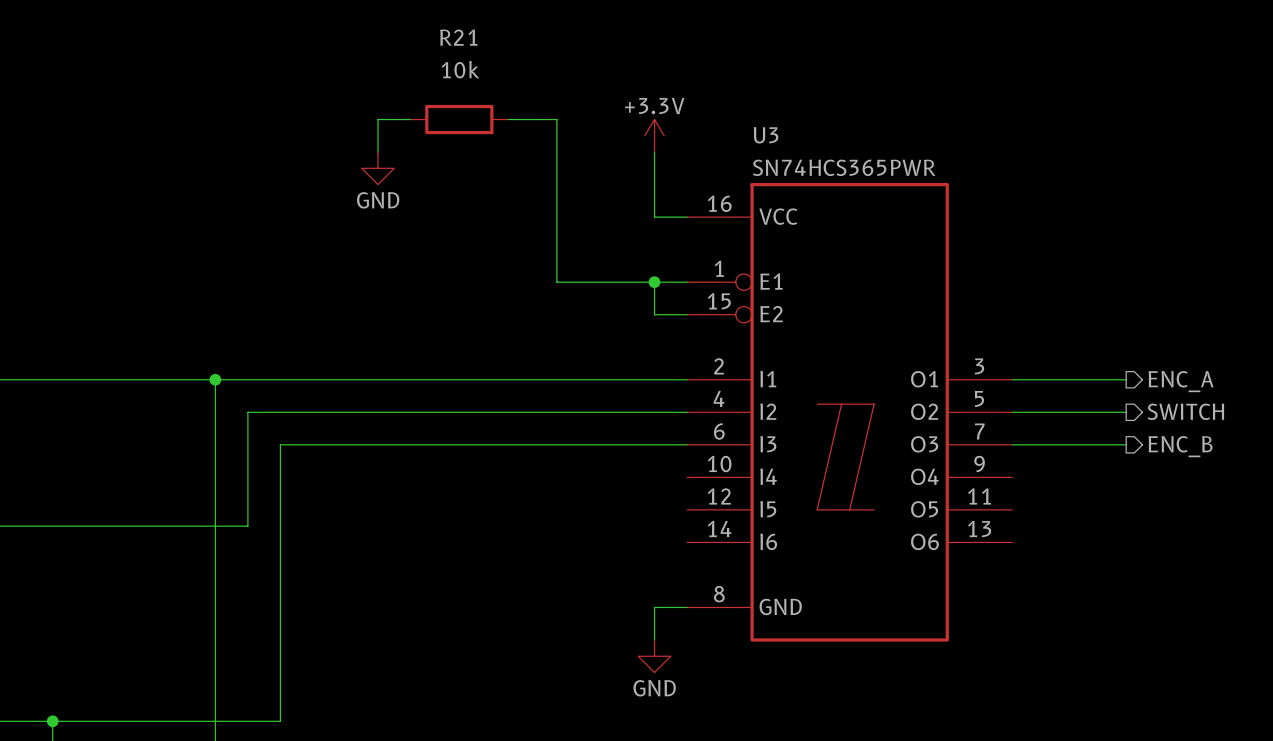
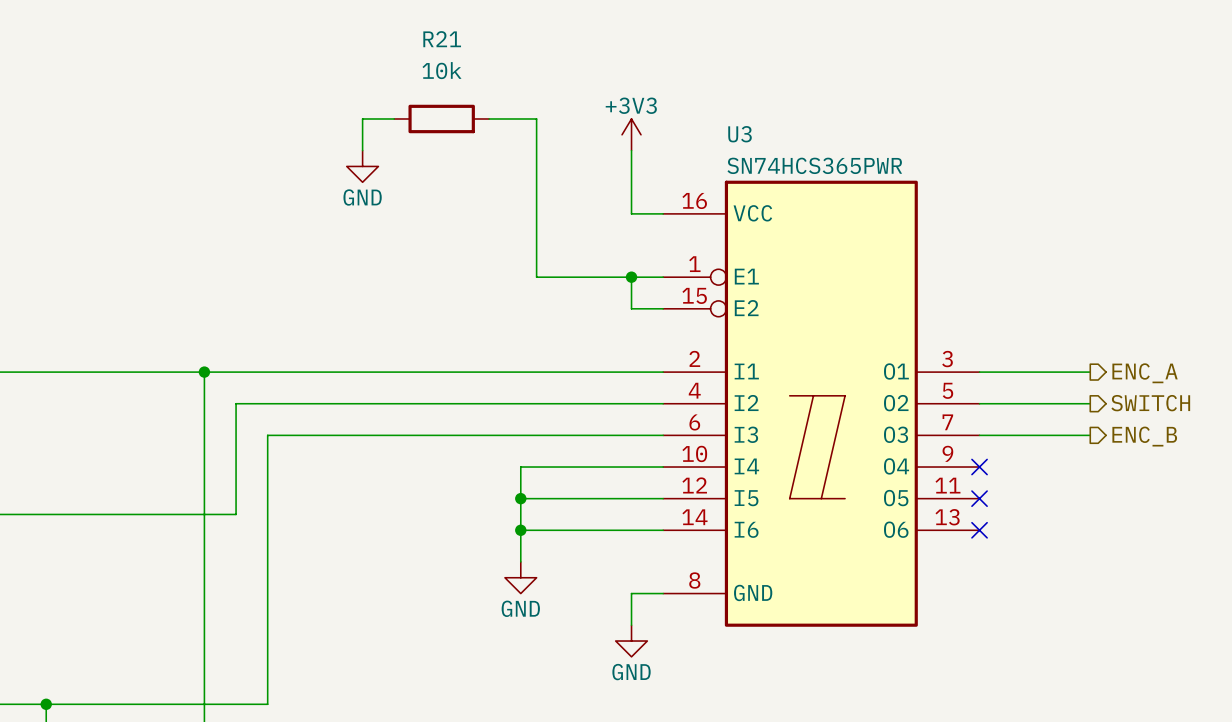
power symbol: +3.3V (654, 135) -> +3V3 (631, 134)
wire: none -> (663, 467) (520, 467) (520, 561)
no-connect mark: none -> (979, 467)
wire: none -> (520, 498) (663, 498)
junction: none -> (520, 498)
no-connect mark: none -> (979, 498)
wire: none -> (520, 530) (663, 530)
junction: none -> (520, 530)
no-connect mark: none -> (979, 530)
power symbol: none -> GND (520, 577)

